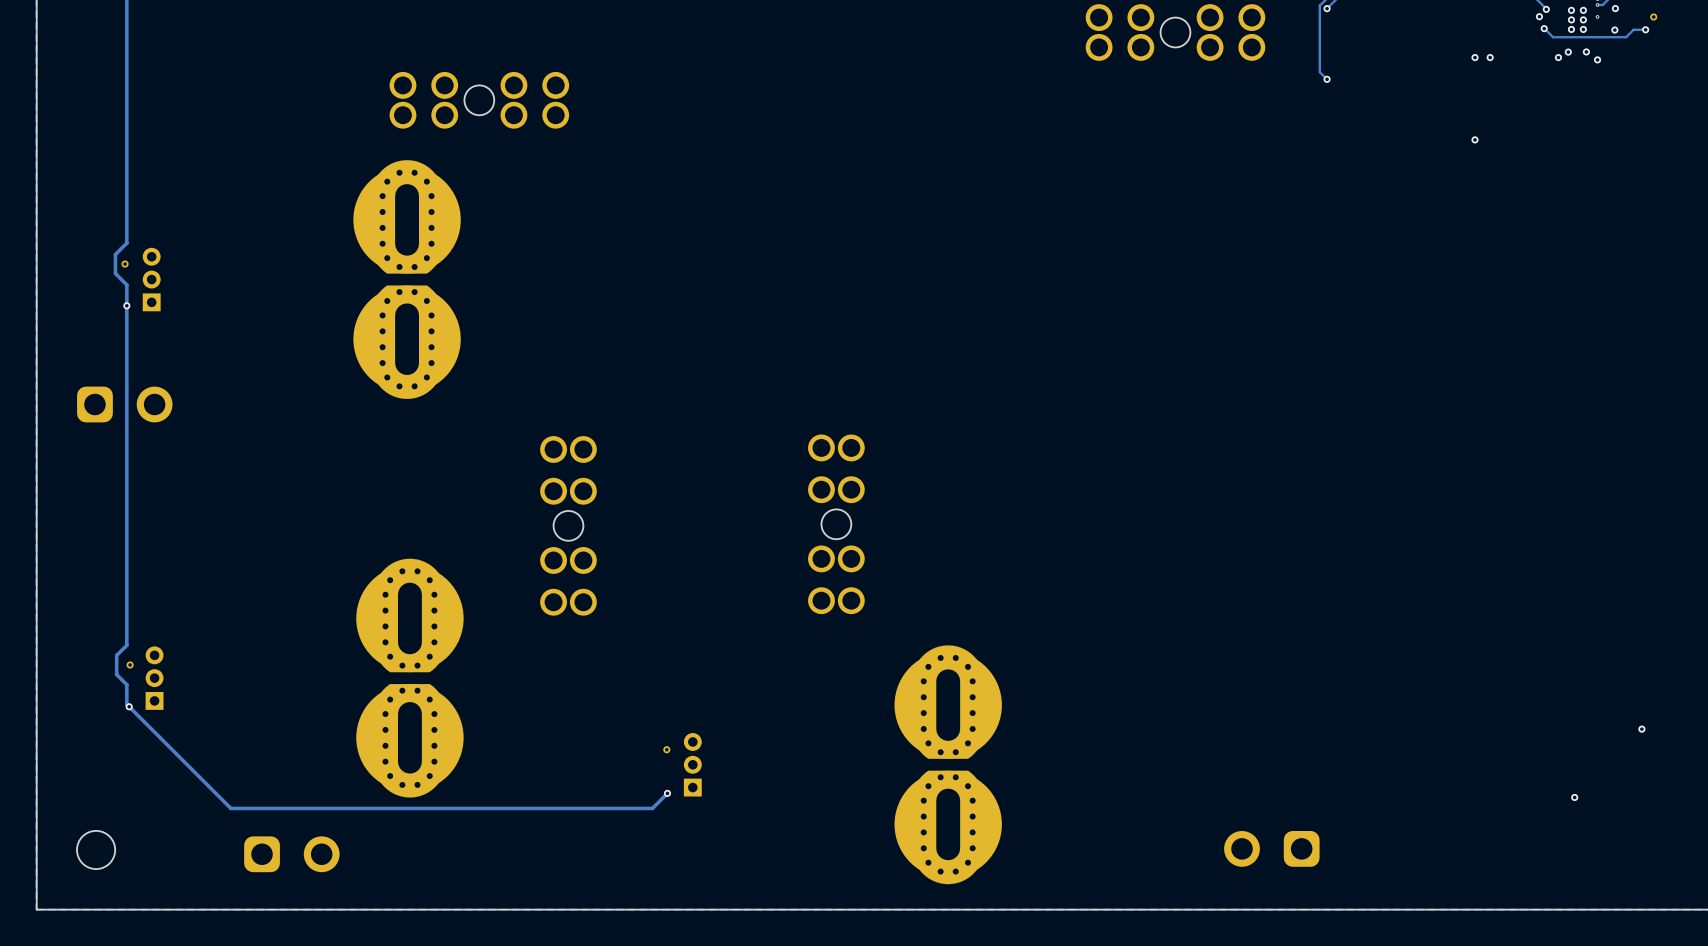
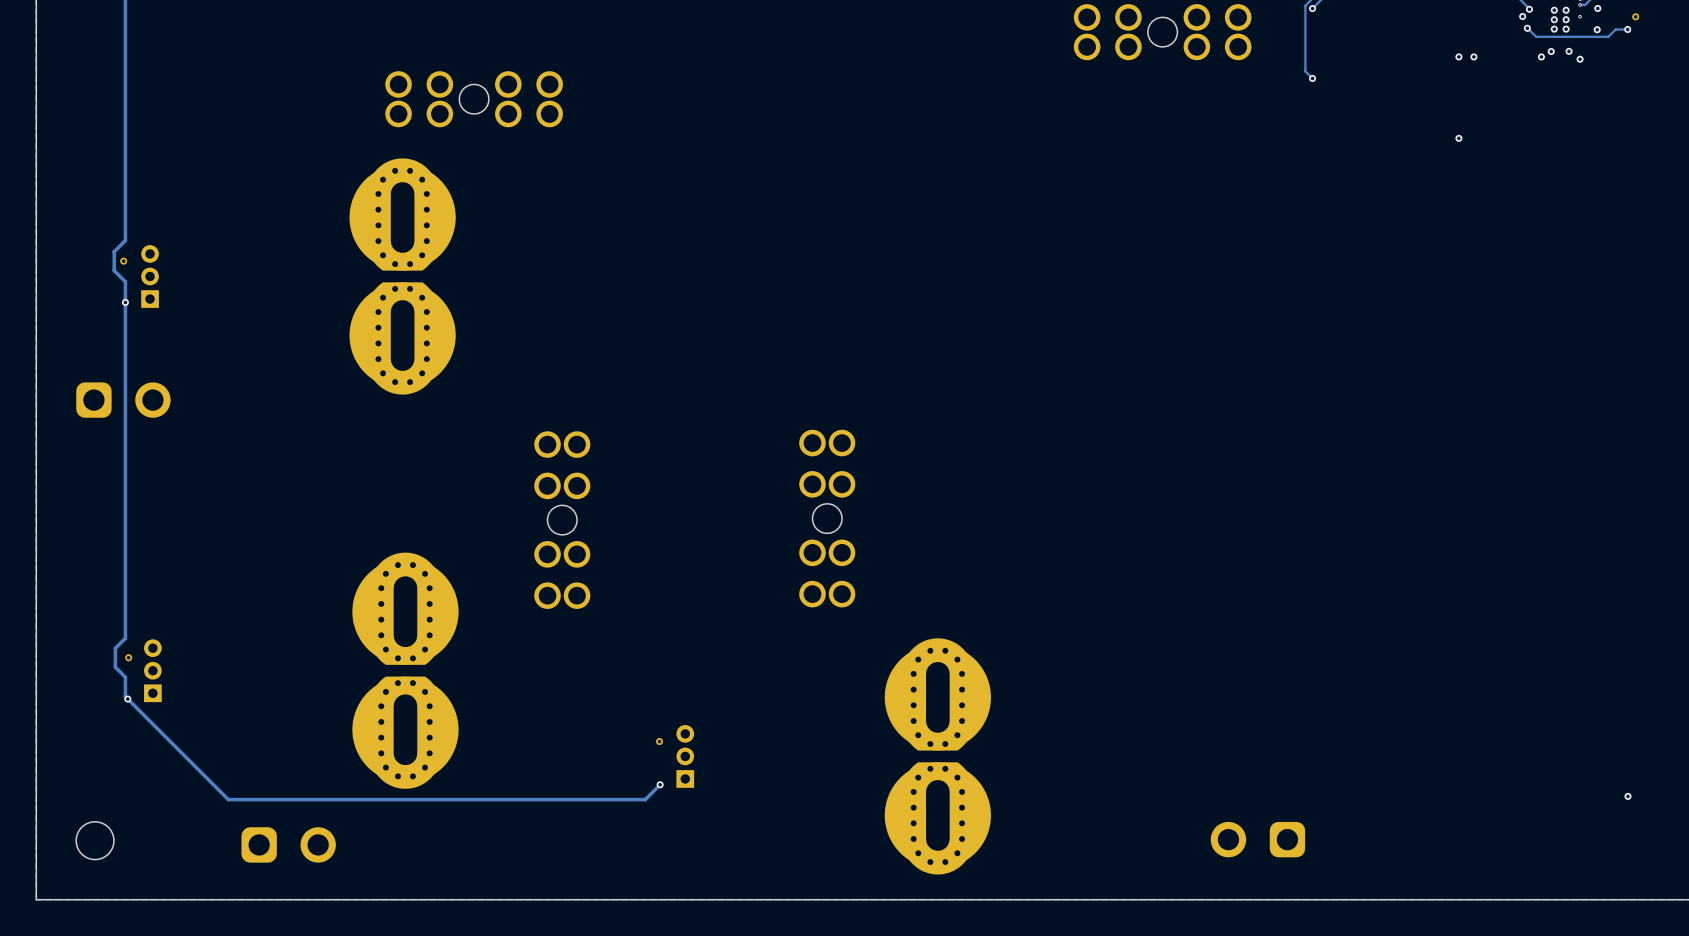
via: (1641, 729) -> none
via: (1574, 797) -> none
via: none -> (1627, 796)

